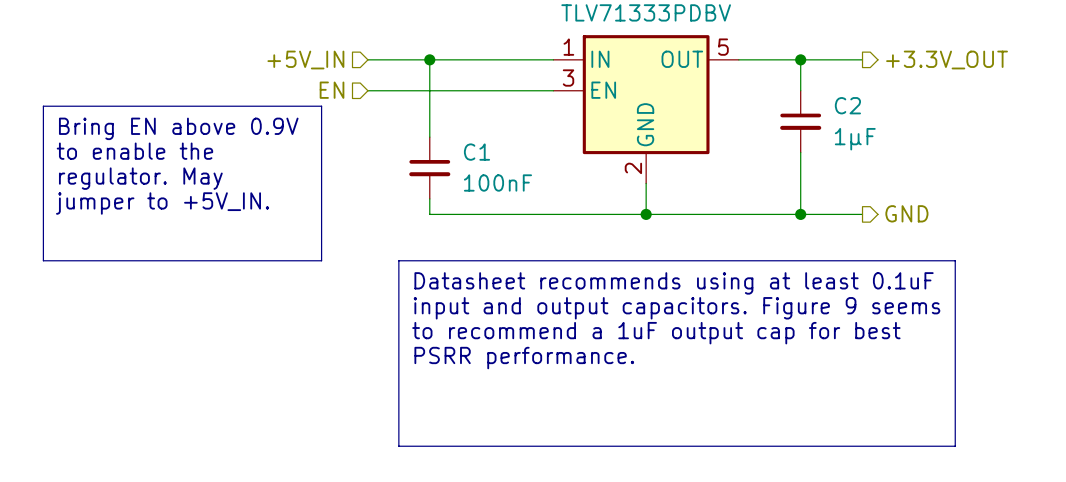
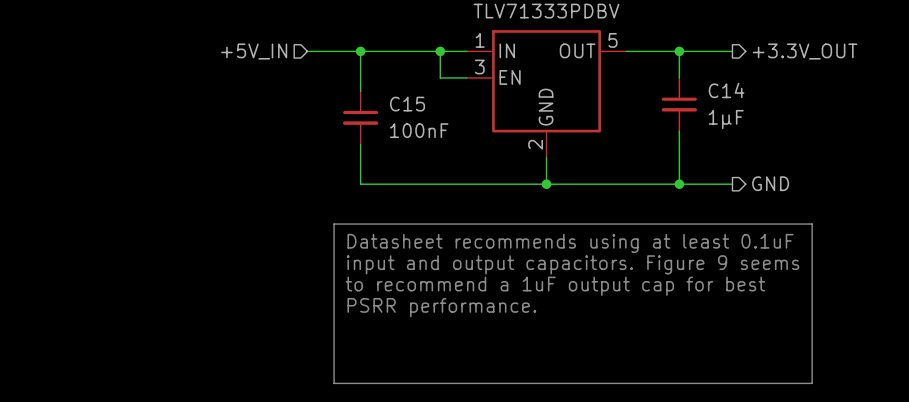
junction: none -> (440, 51)
hierarchical label: EN (332, 90) -> none
wire: (367, 90) (522, 90) -> (440, 51) (440, 77)
C2 name: C2 (847, 105) -> C14 (726, 90)
line: (43, 106) (321, 106) (321, 260) (43, 260) (43, 106) -> none
text: Bring EN above 0.9V (178, 128) -> none
C15: none -> 100nF (360, 117)
text: to enable the (134, 151) -> none
C1: 100nF (429, 168) -> none
text: regulator. May (140, 178) -> none
text: jumper to +5V_IN. (162, 203) -> none

